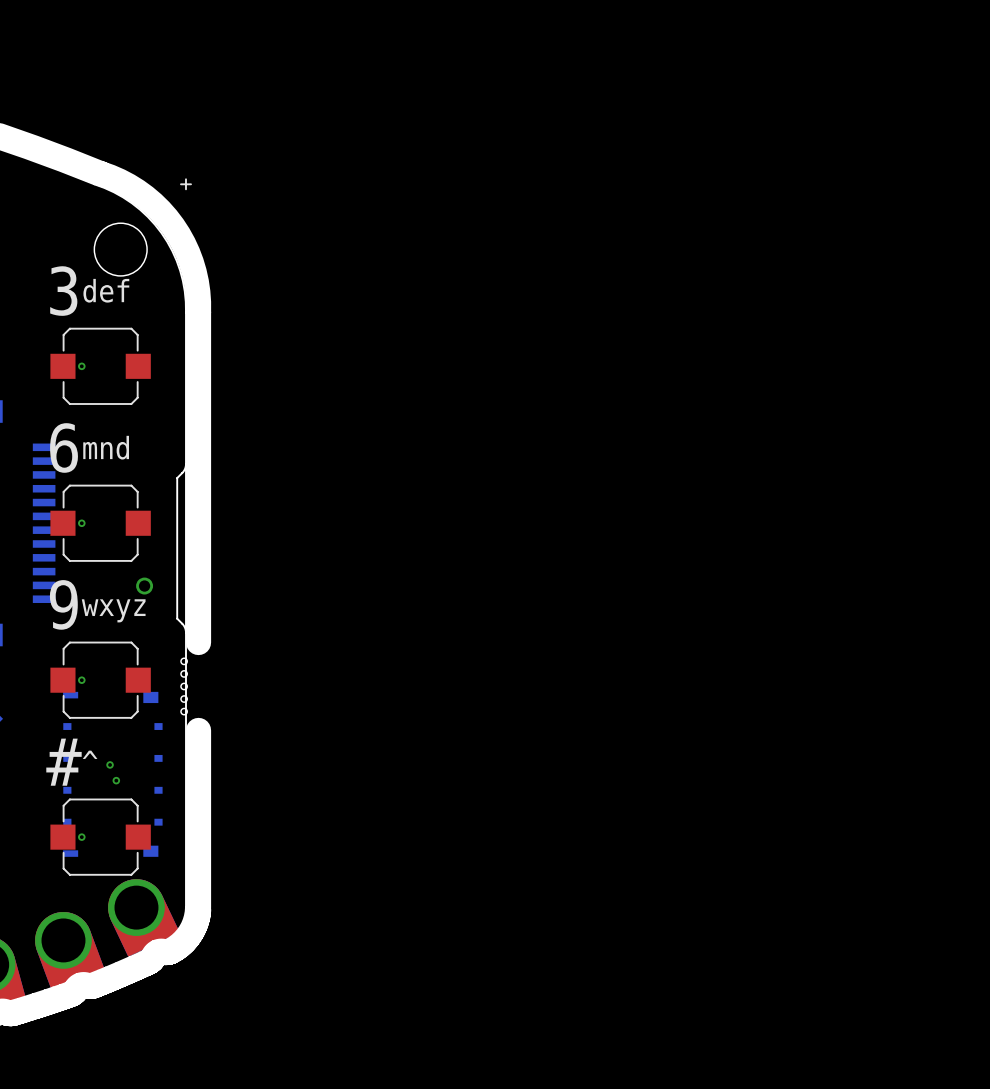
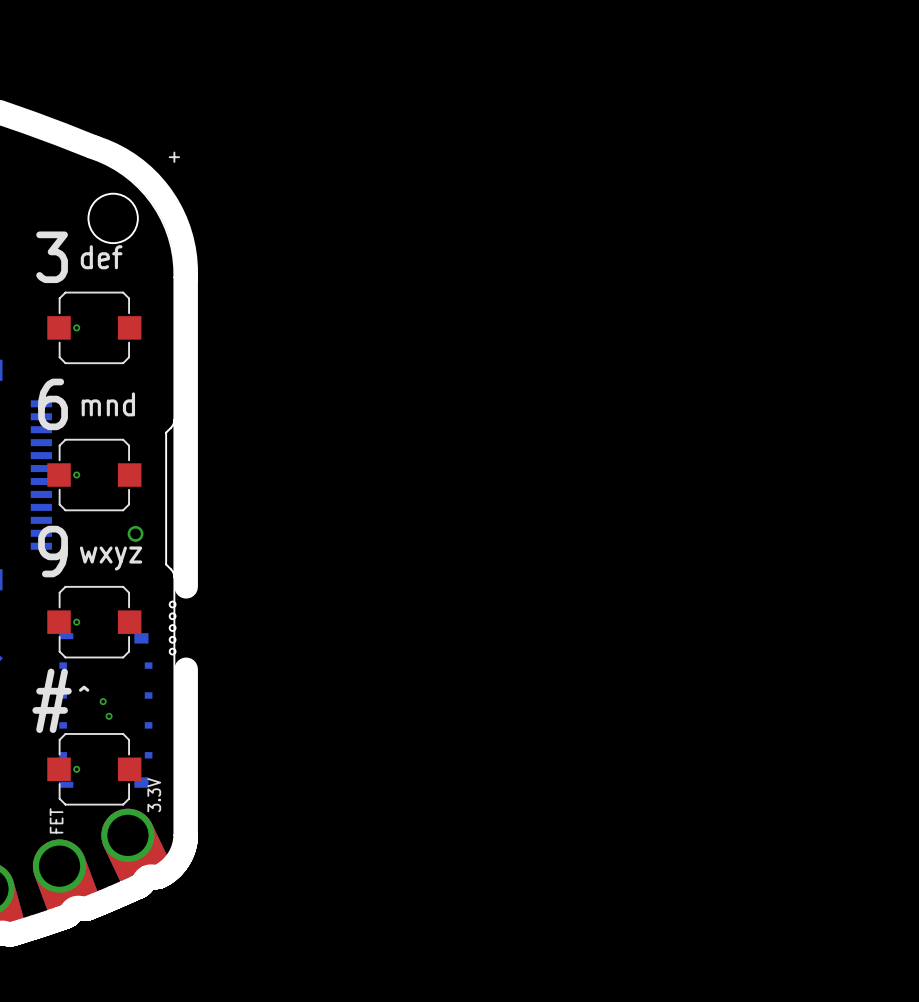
text: none -> 3.3V (154, 795)
text: none -> FET (56, 820)

